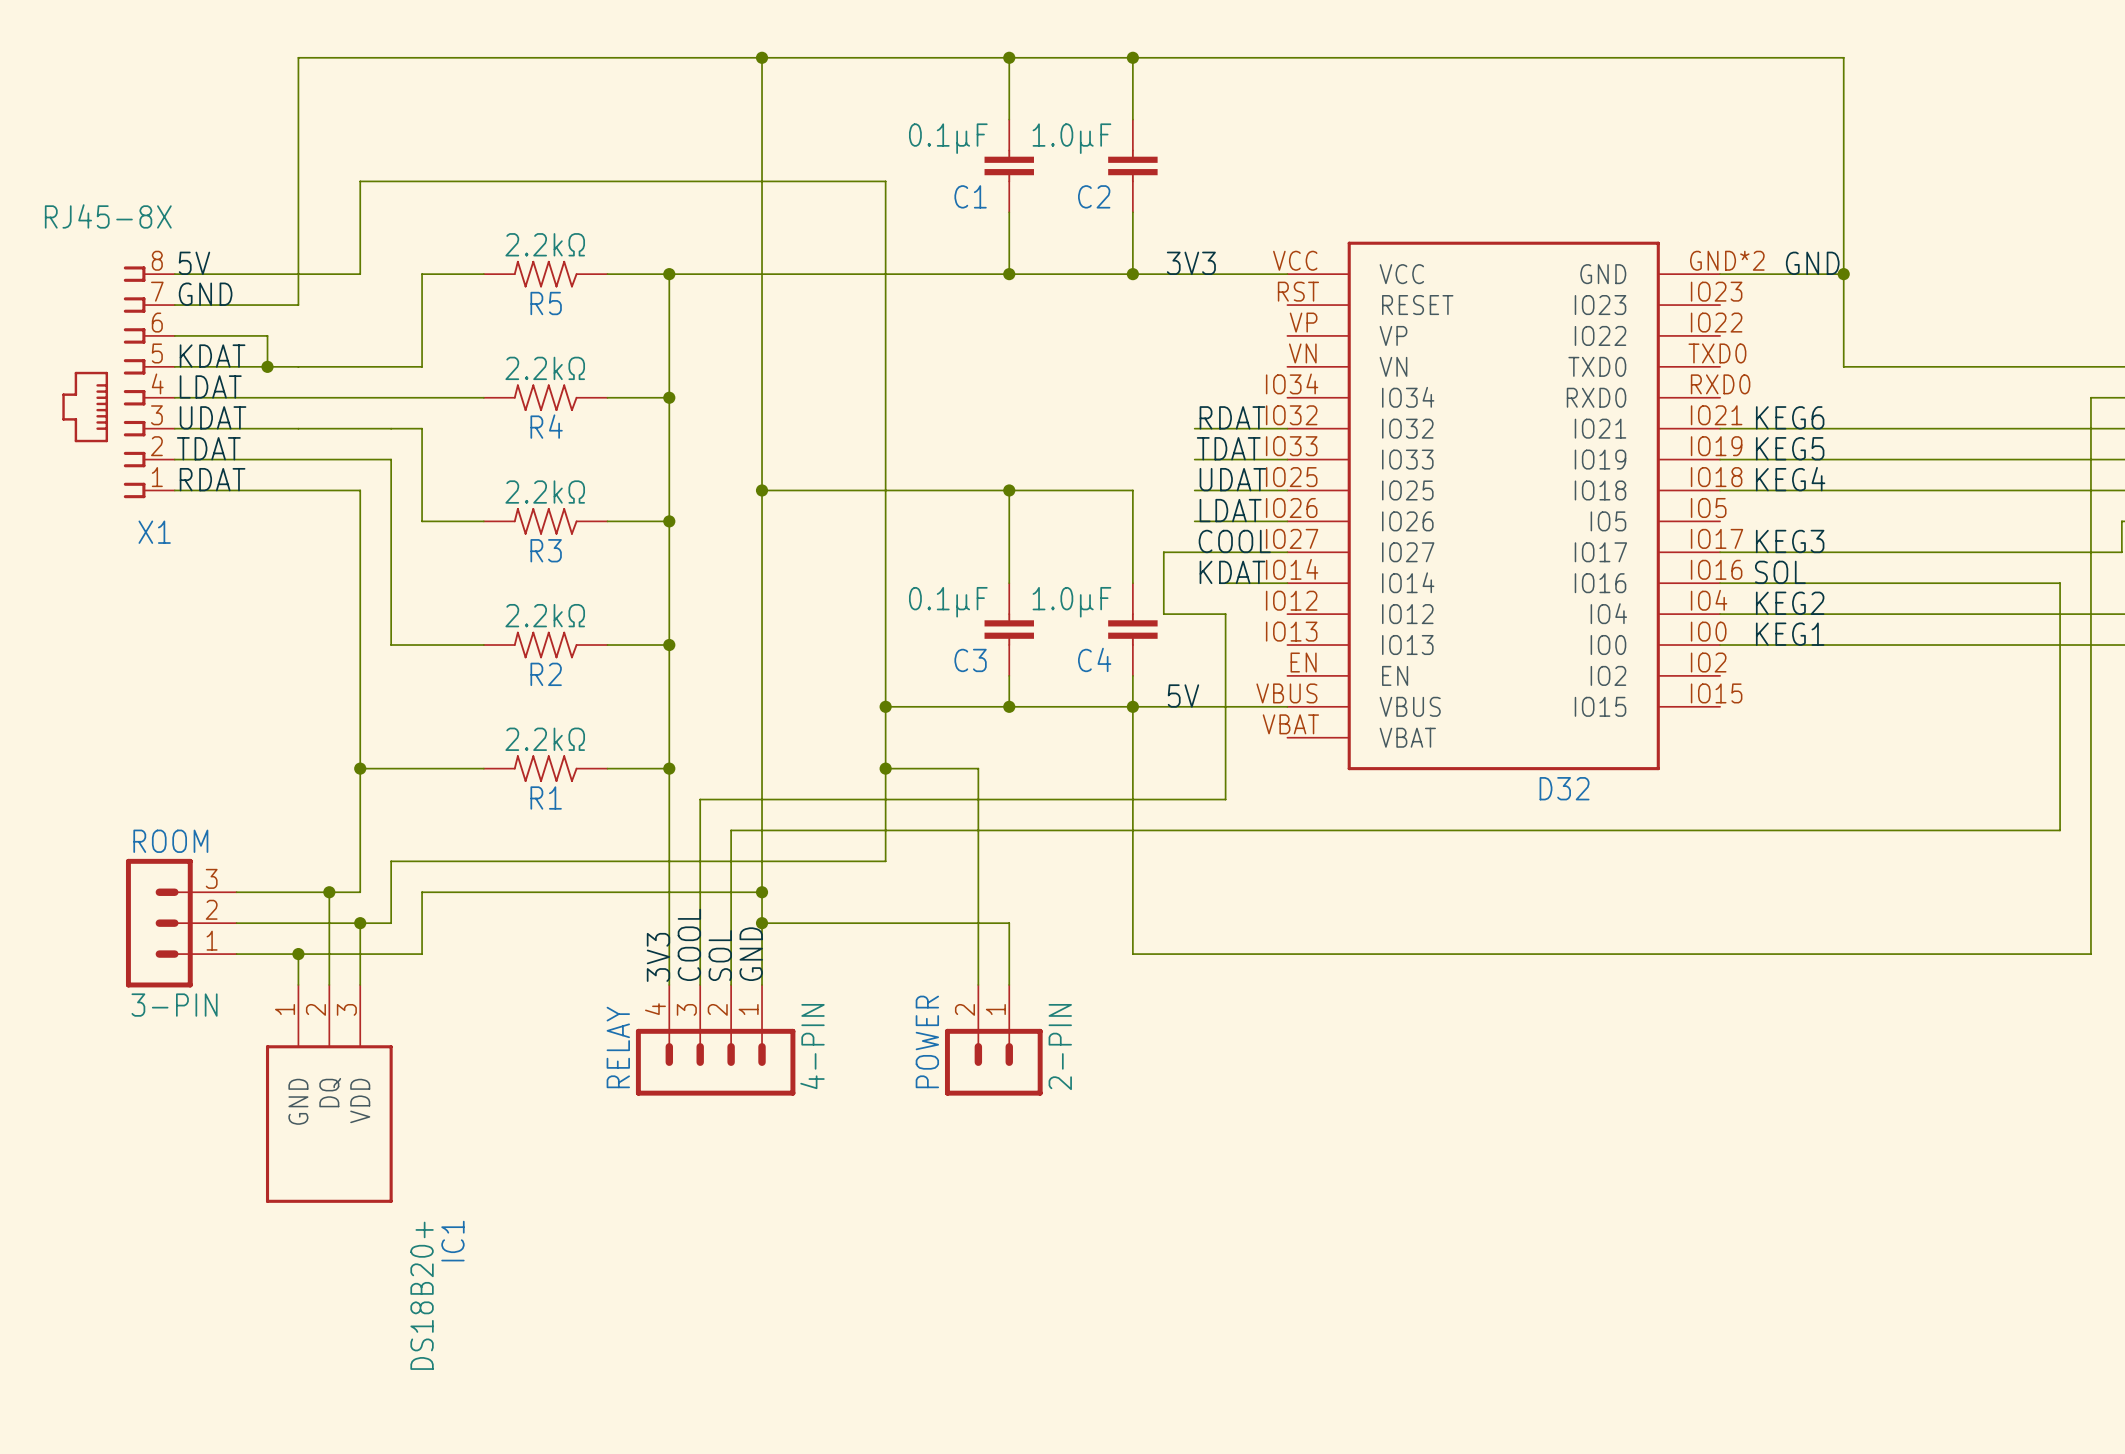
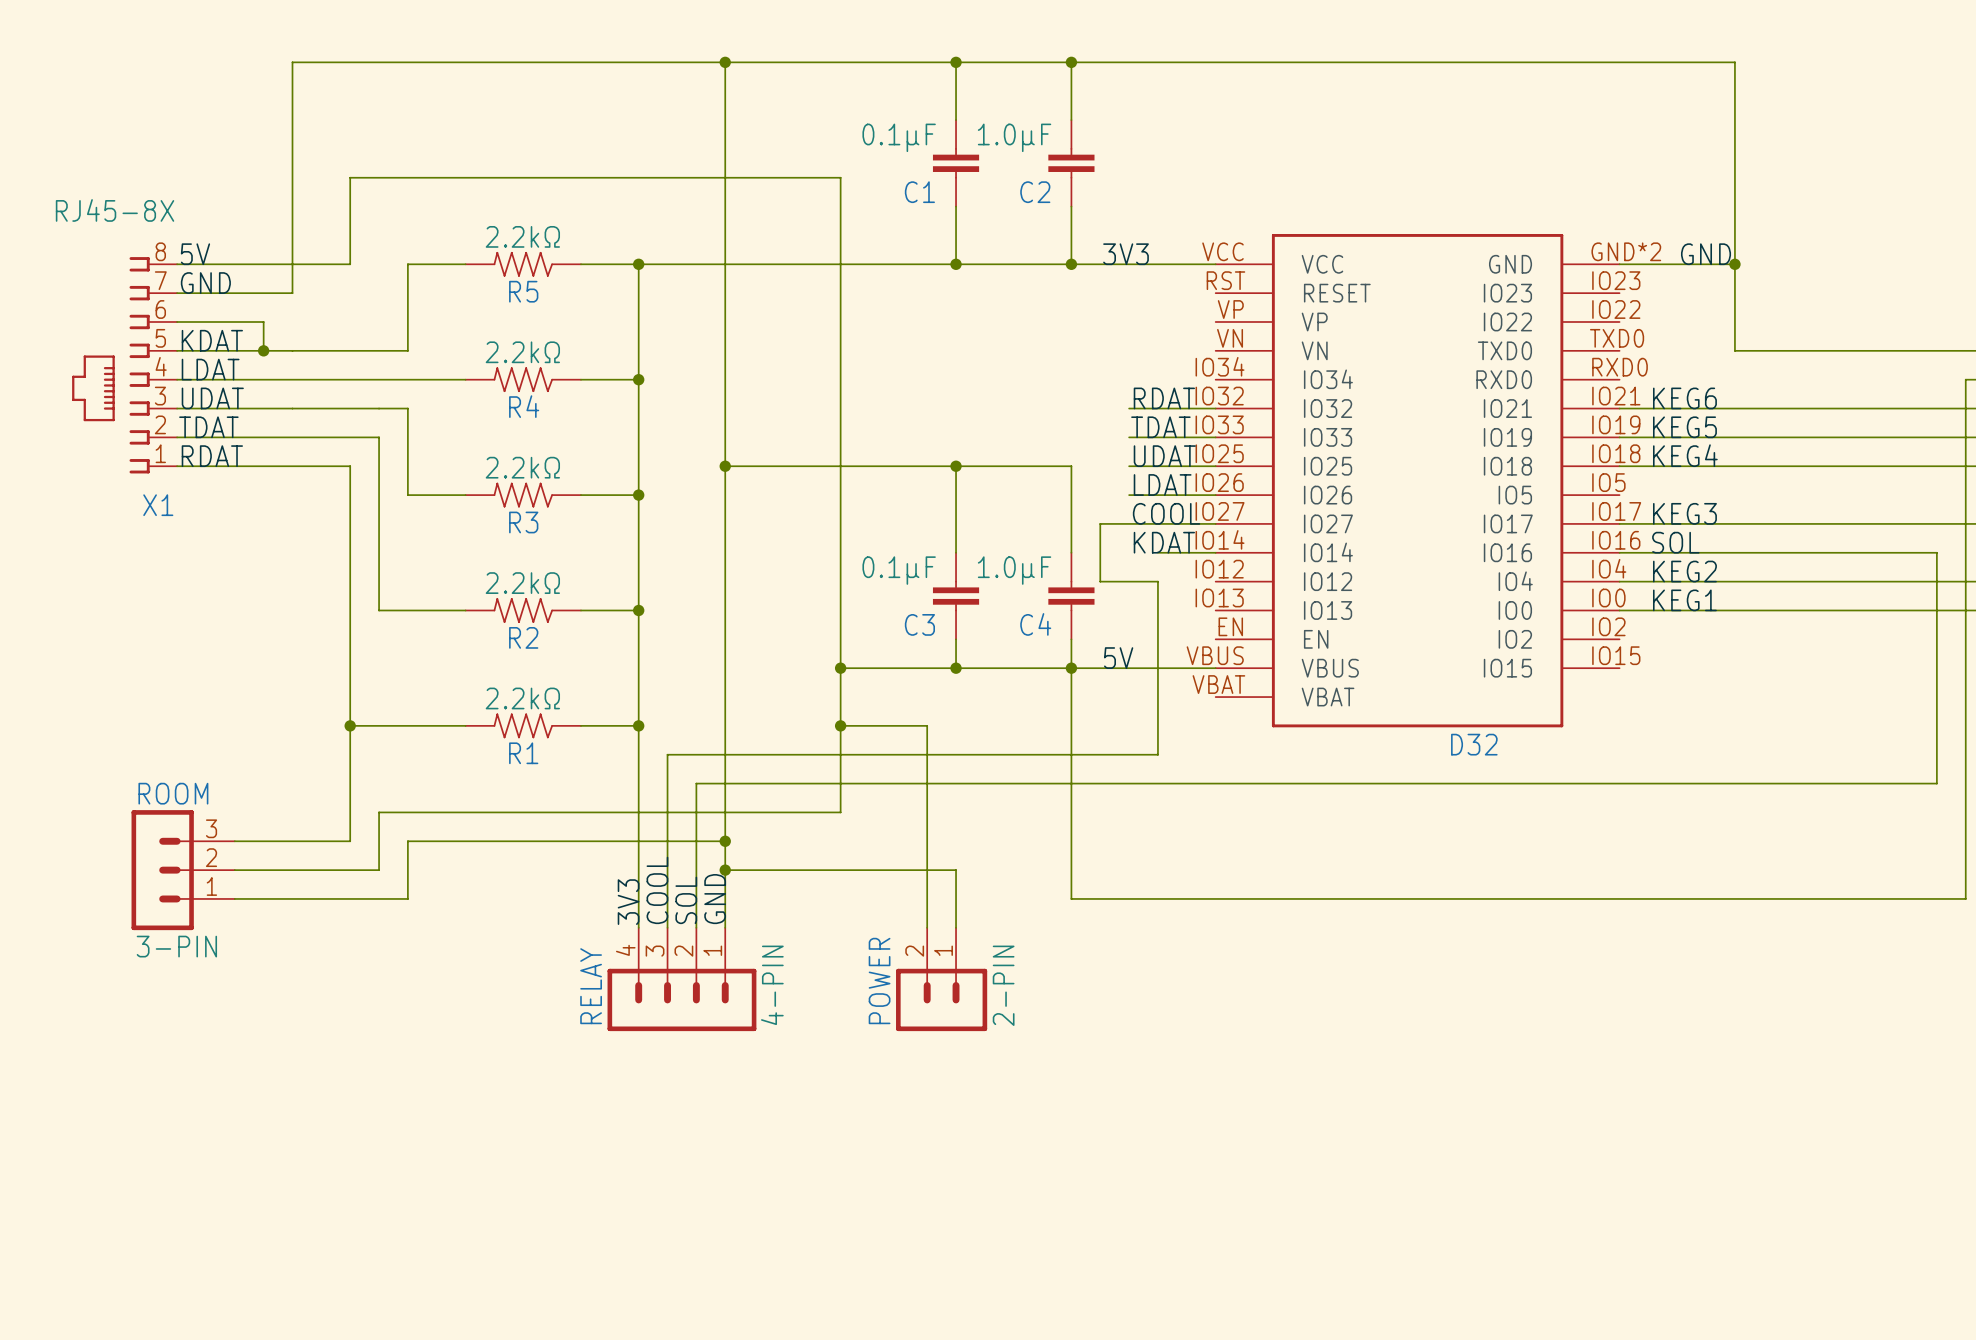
wire: (329, 892) (329, 984) -> none
junction: (329, 892) -> none
wire: (360, 923) (360, 984) -> none
junction: (360, 923) -> none
wire: (298, 954) (298, 984) -> none
junction: (298, 954) -> none
IC1: DS18B20+ (329, 1093) -> none

